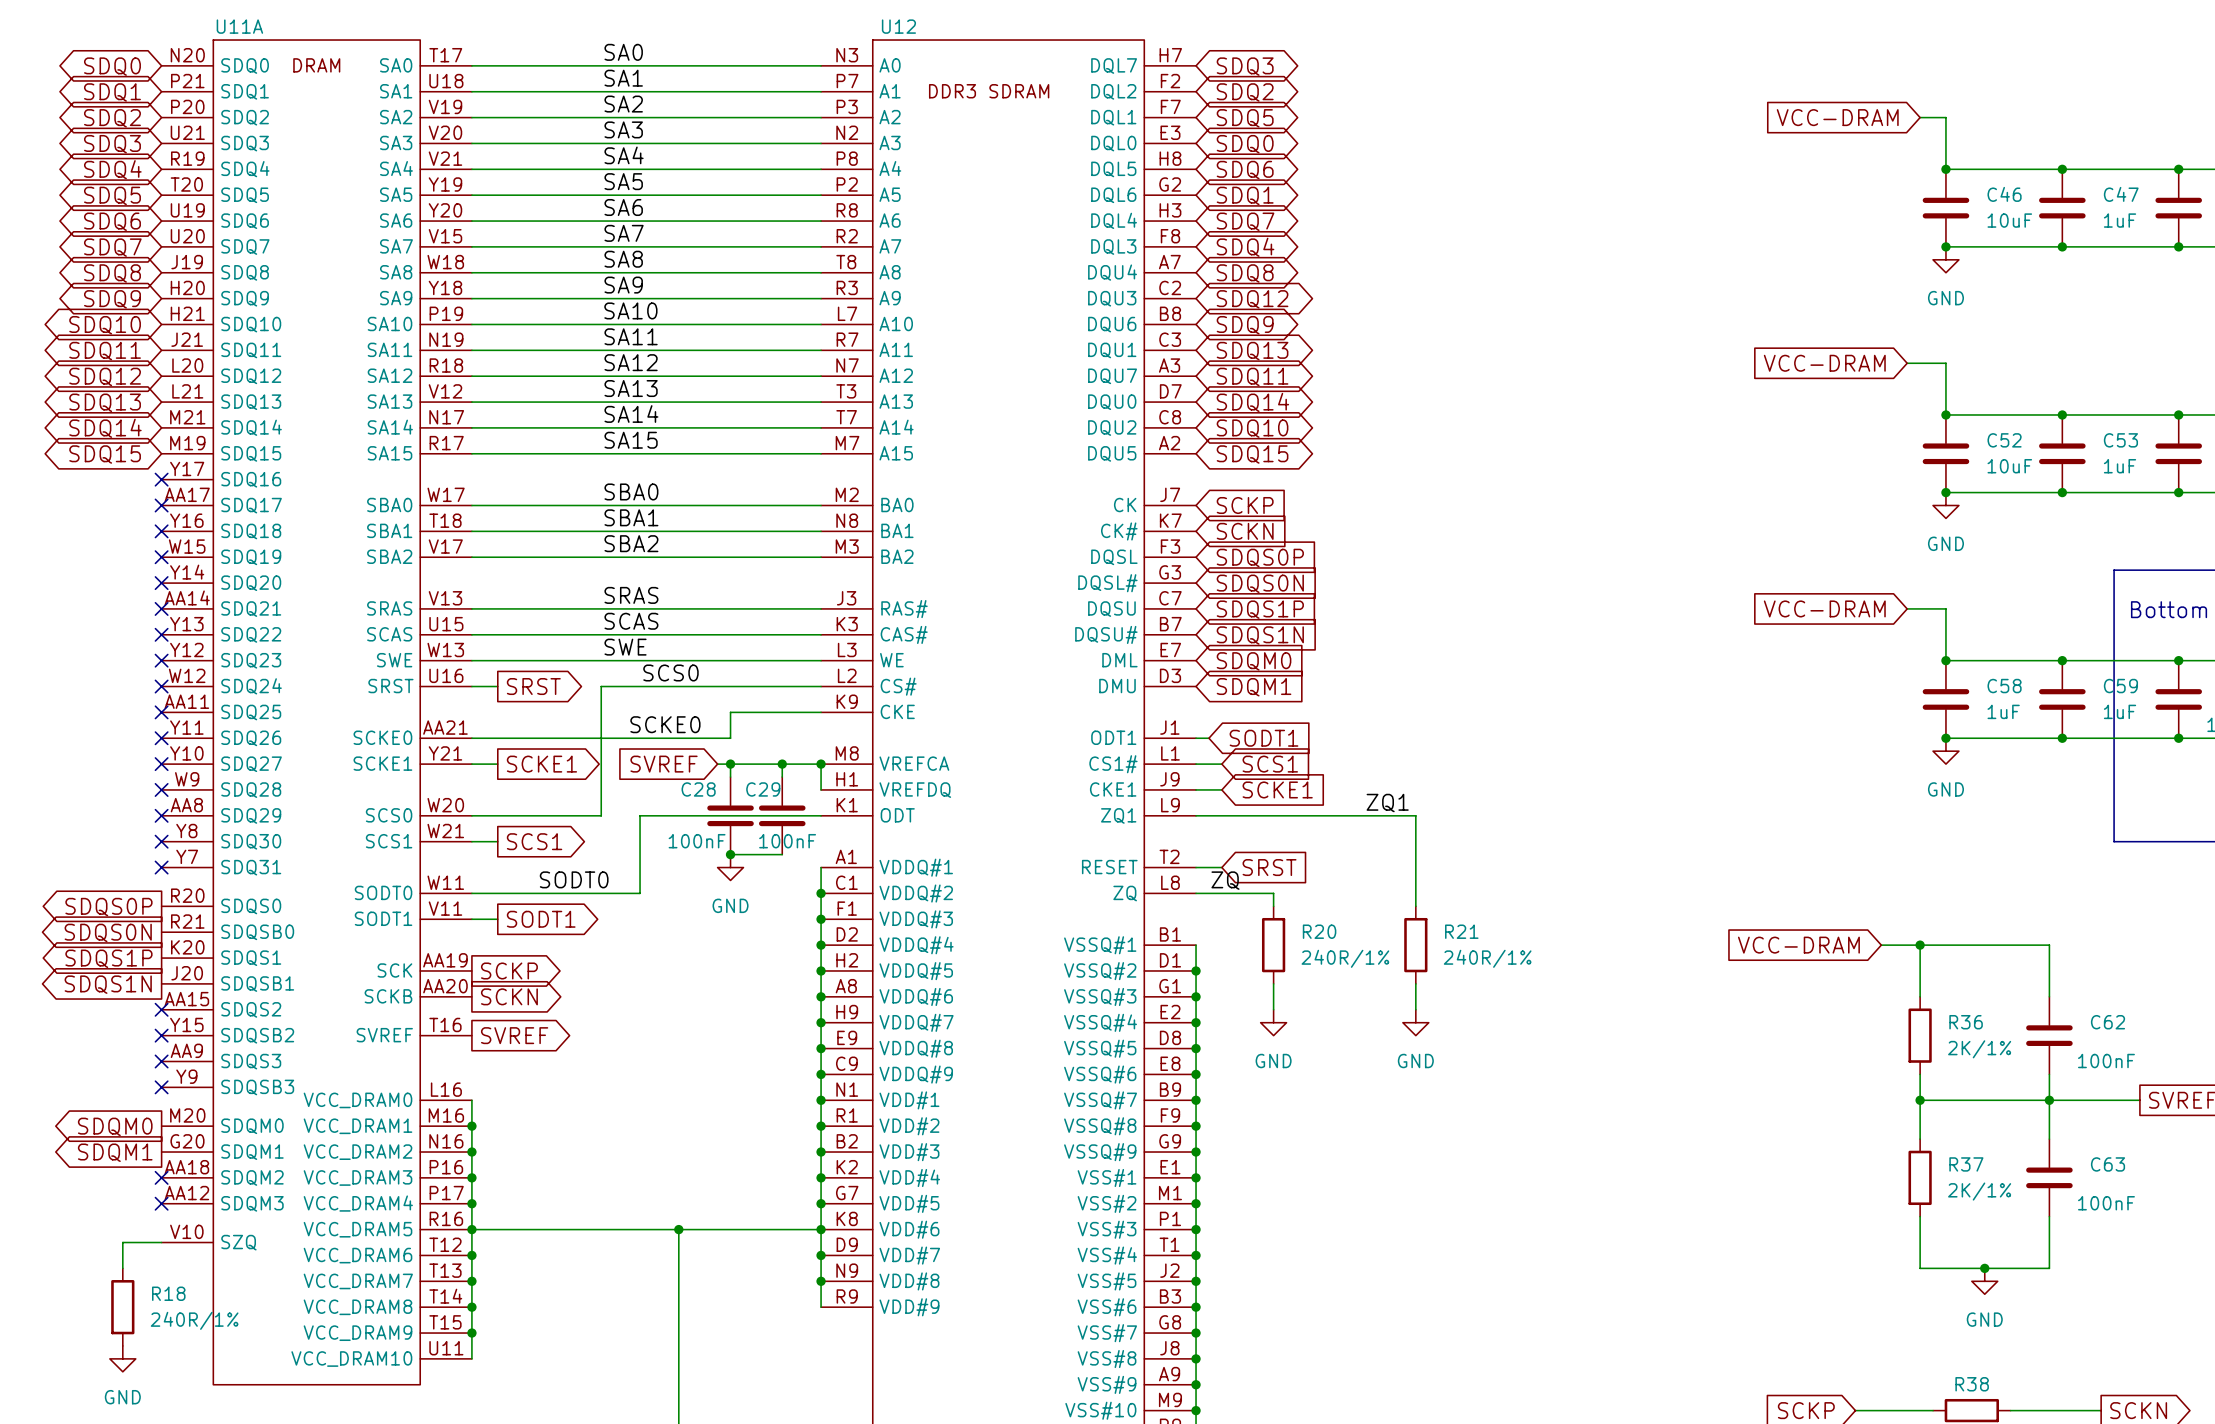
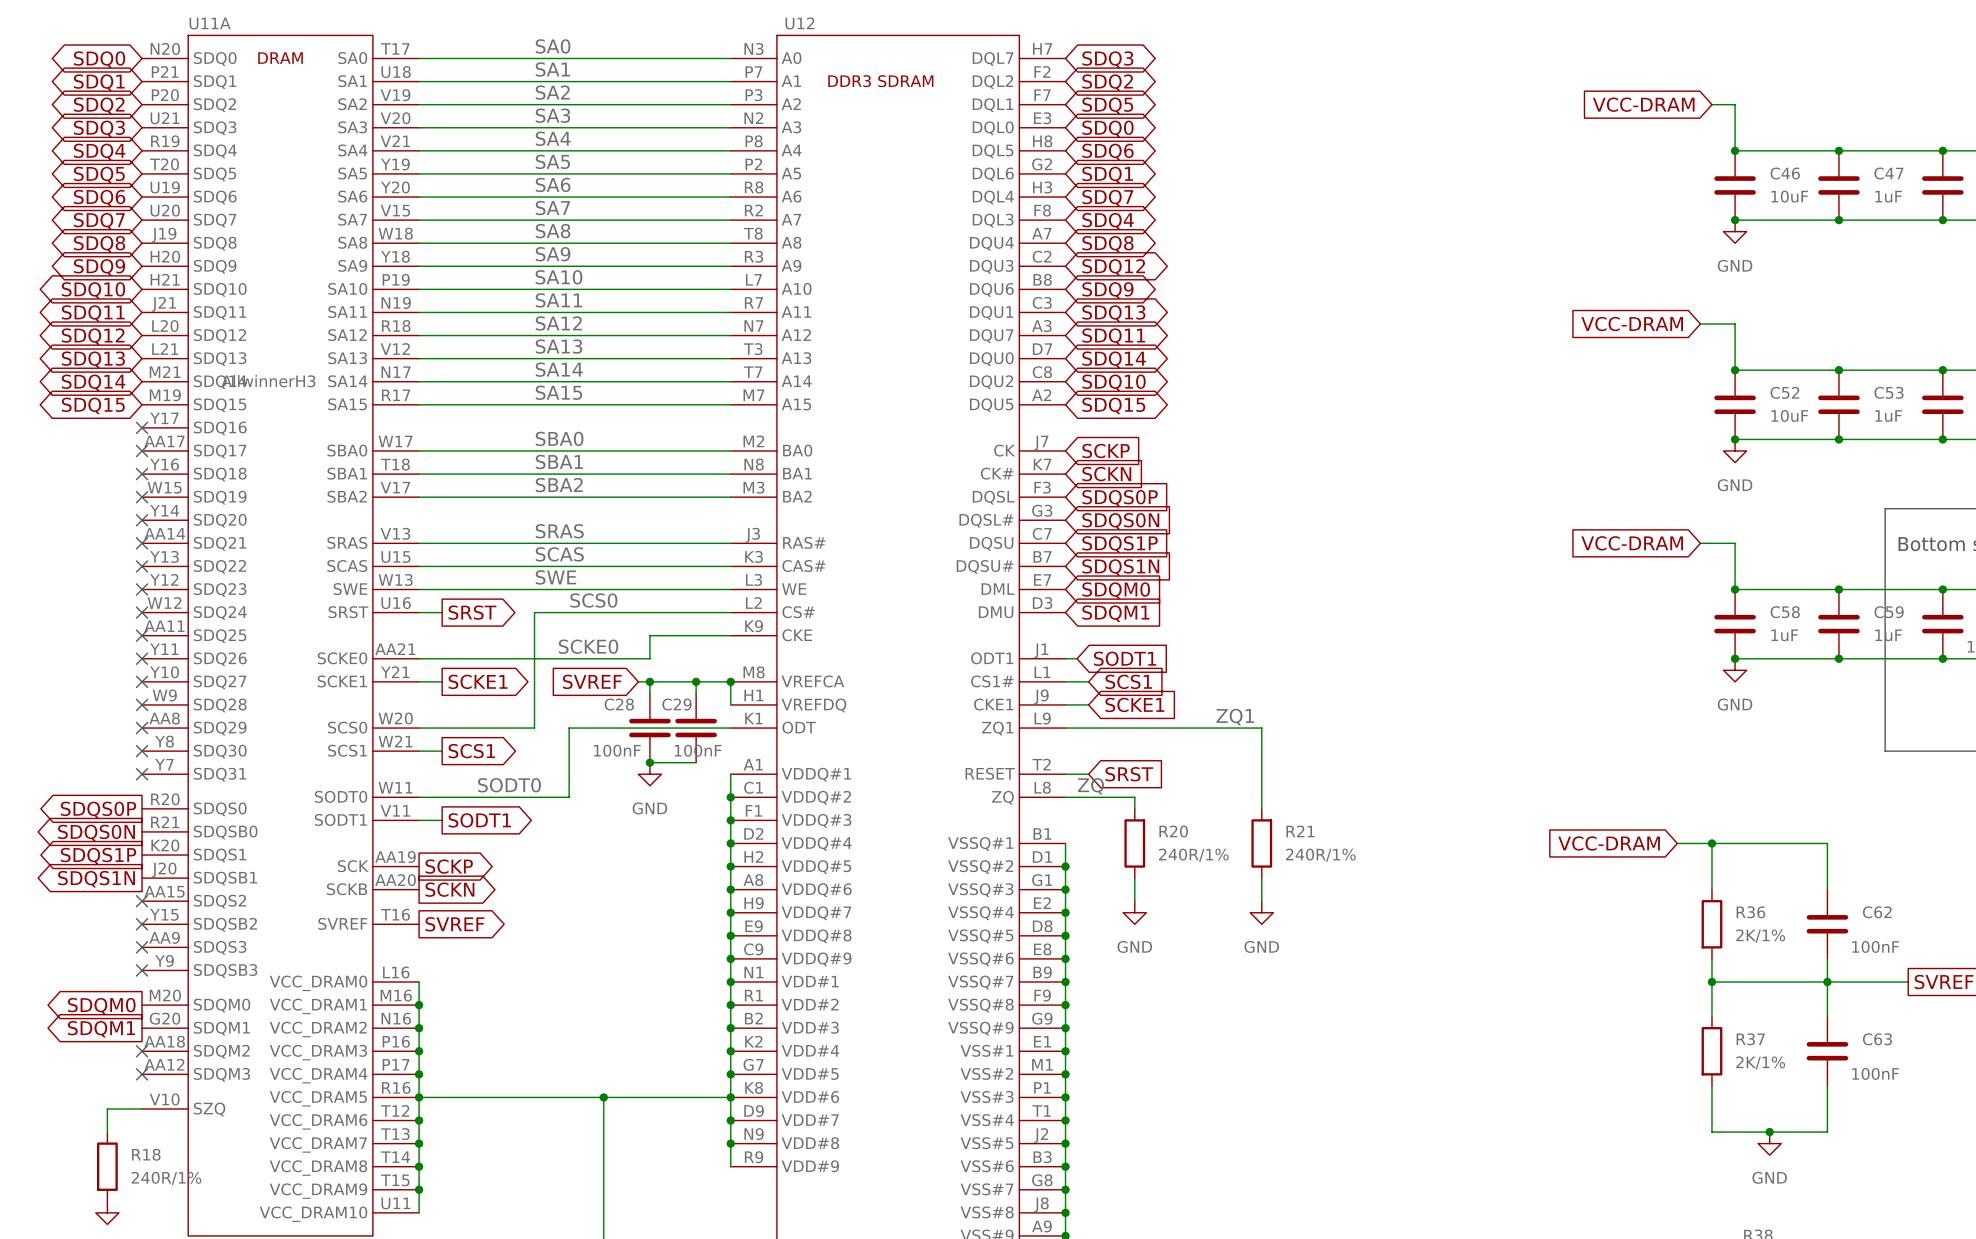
U11A value: none -> AllwinnerH3 (268, 381)

